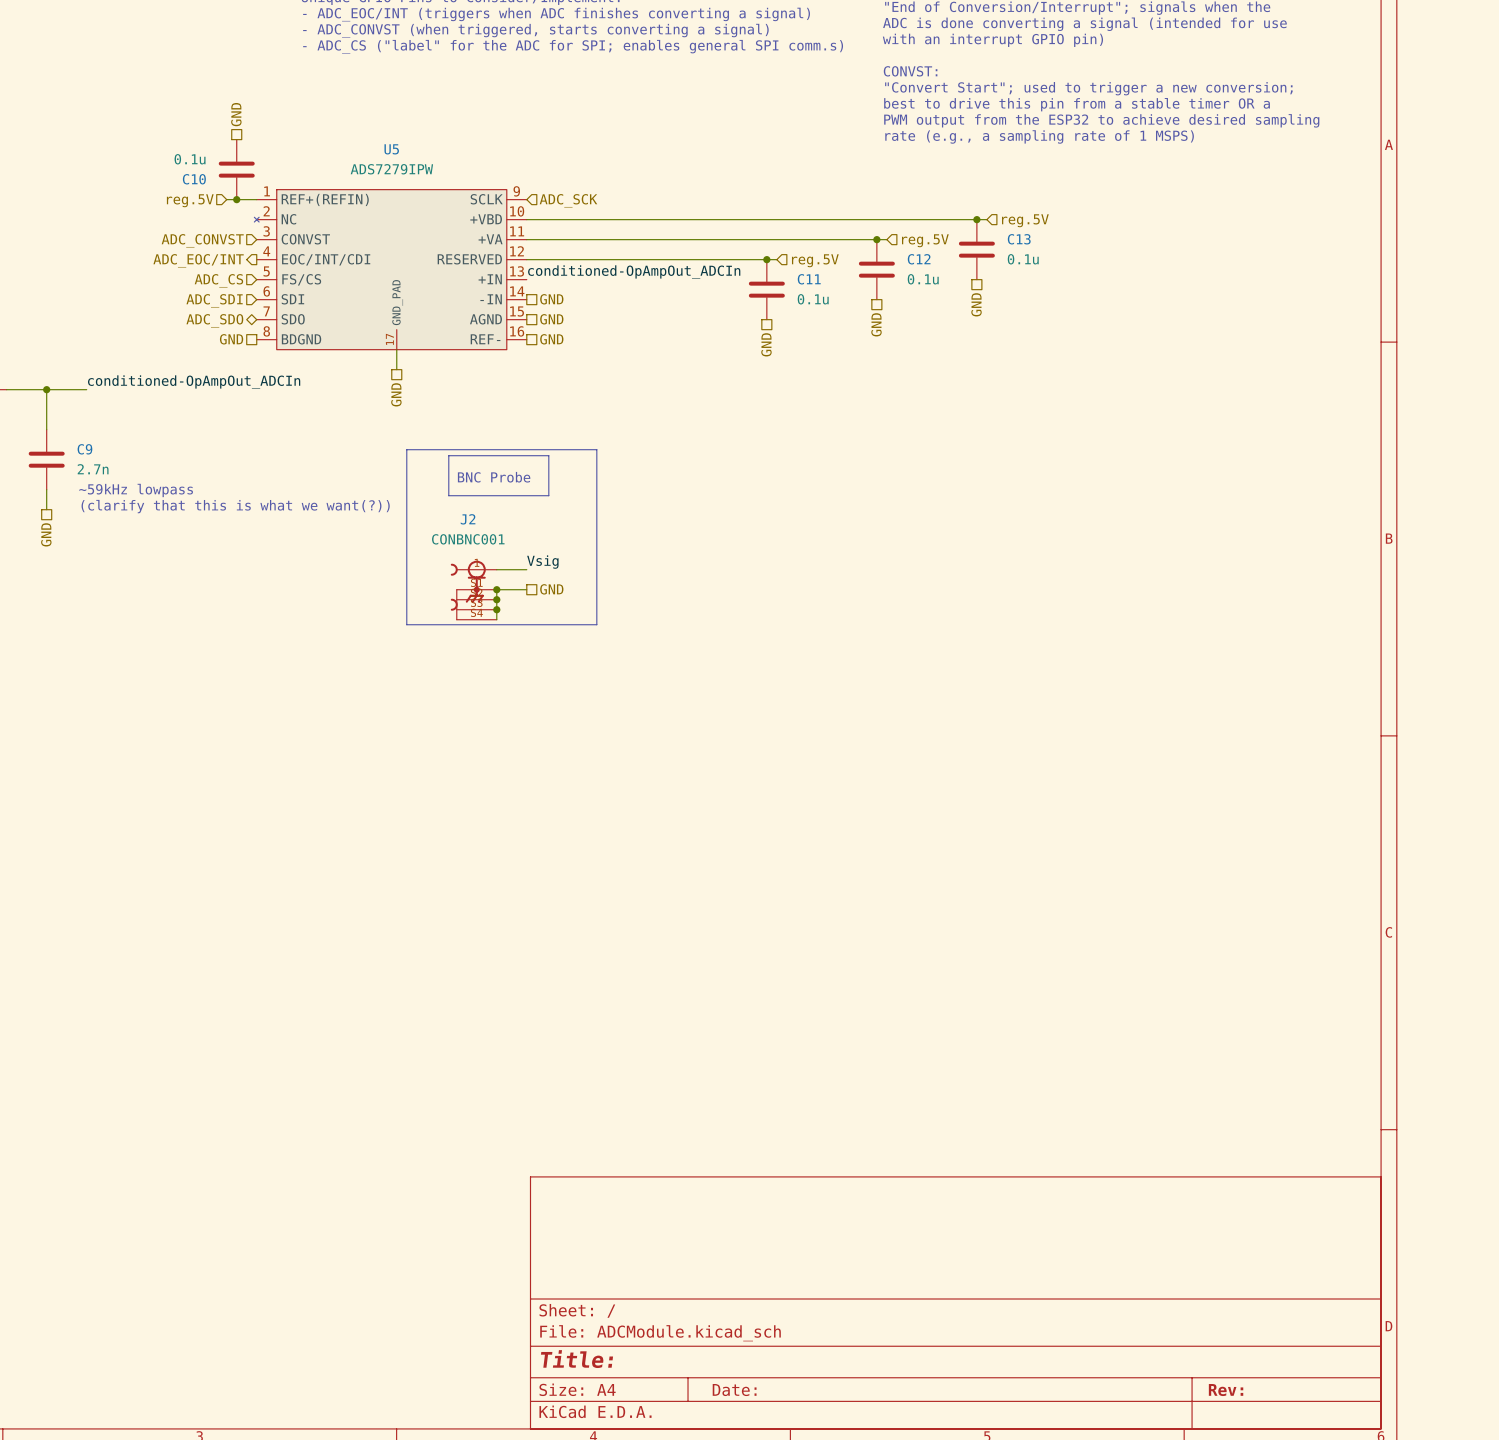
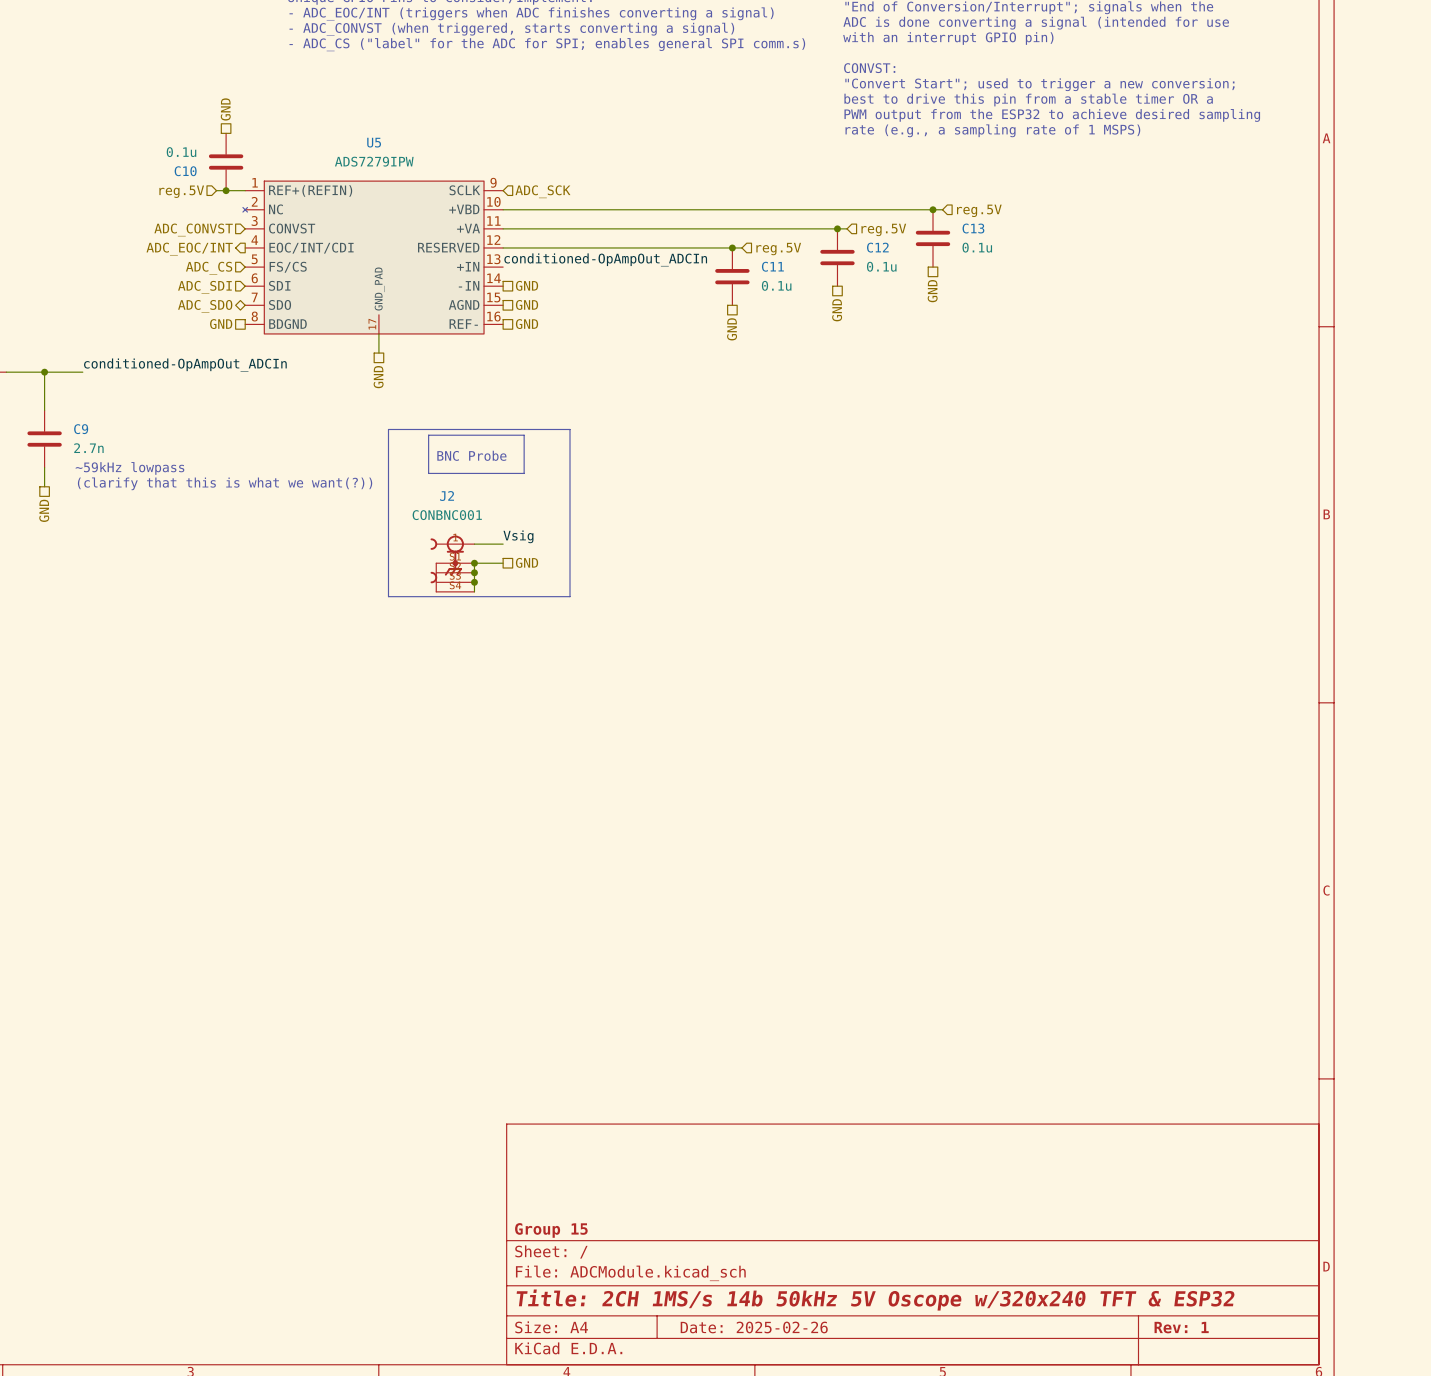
title block: none -> Group 15 (551, 1230)
title block: Title: (577, 1359) -> Title: 2CH 1MS/s 14b 50kHz 5V Oscope w/320x240 TFT & ESP32 (875, 1300)
title block: Date: (734, 1390) -> Date: 2025-02-26 (754, 1327)
title block: Rev: (1226, 1390) -> Rev: 1 (1181, 1327)

